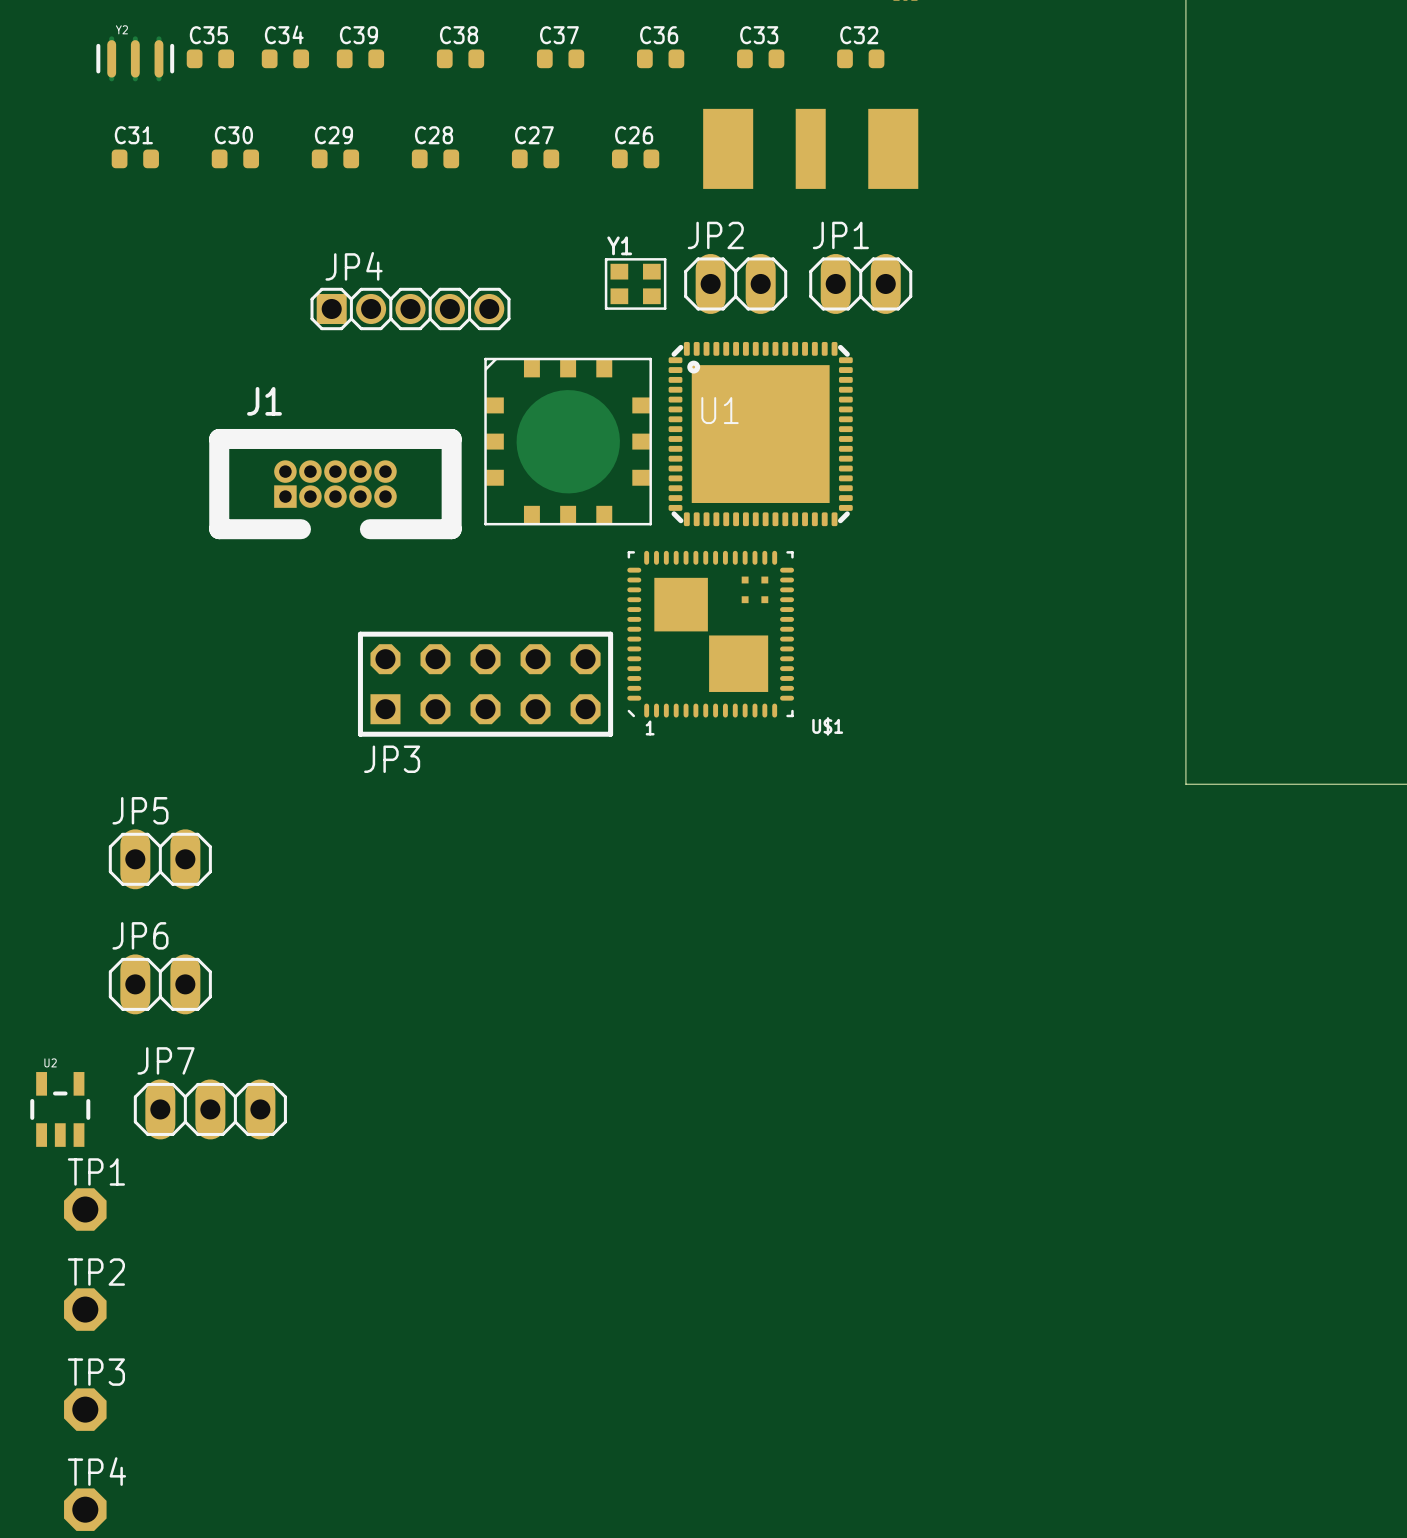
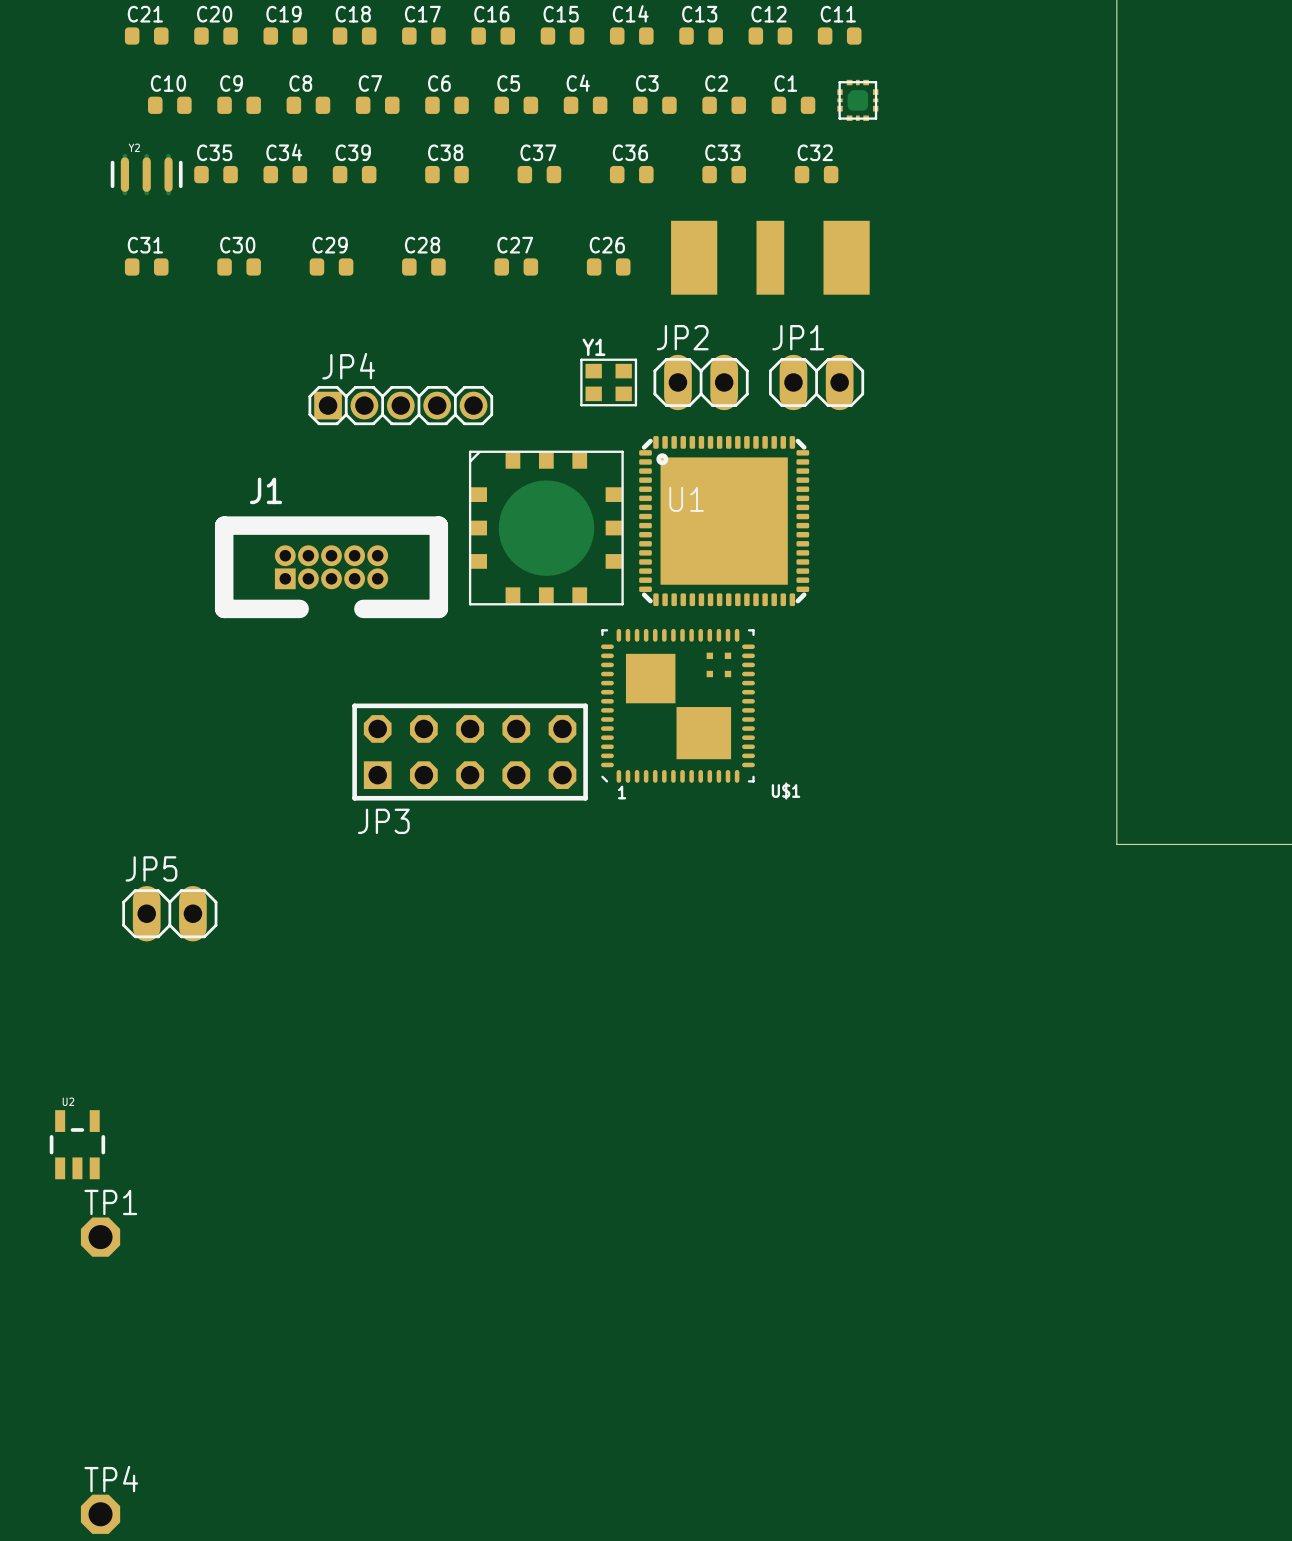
JP6: (160, 984) -> none
JP7: (210, 1109) -> none
TP2: (85, 1309) -> none
TP3: (85, 1409) -> none

